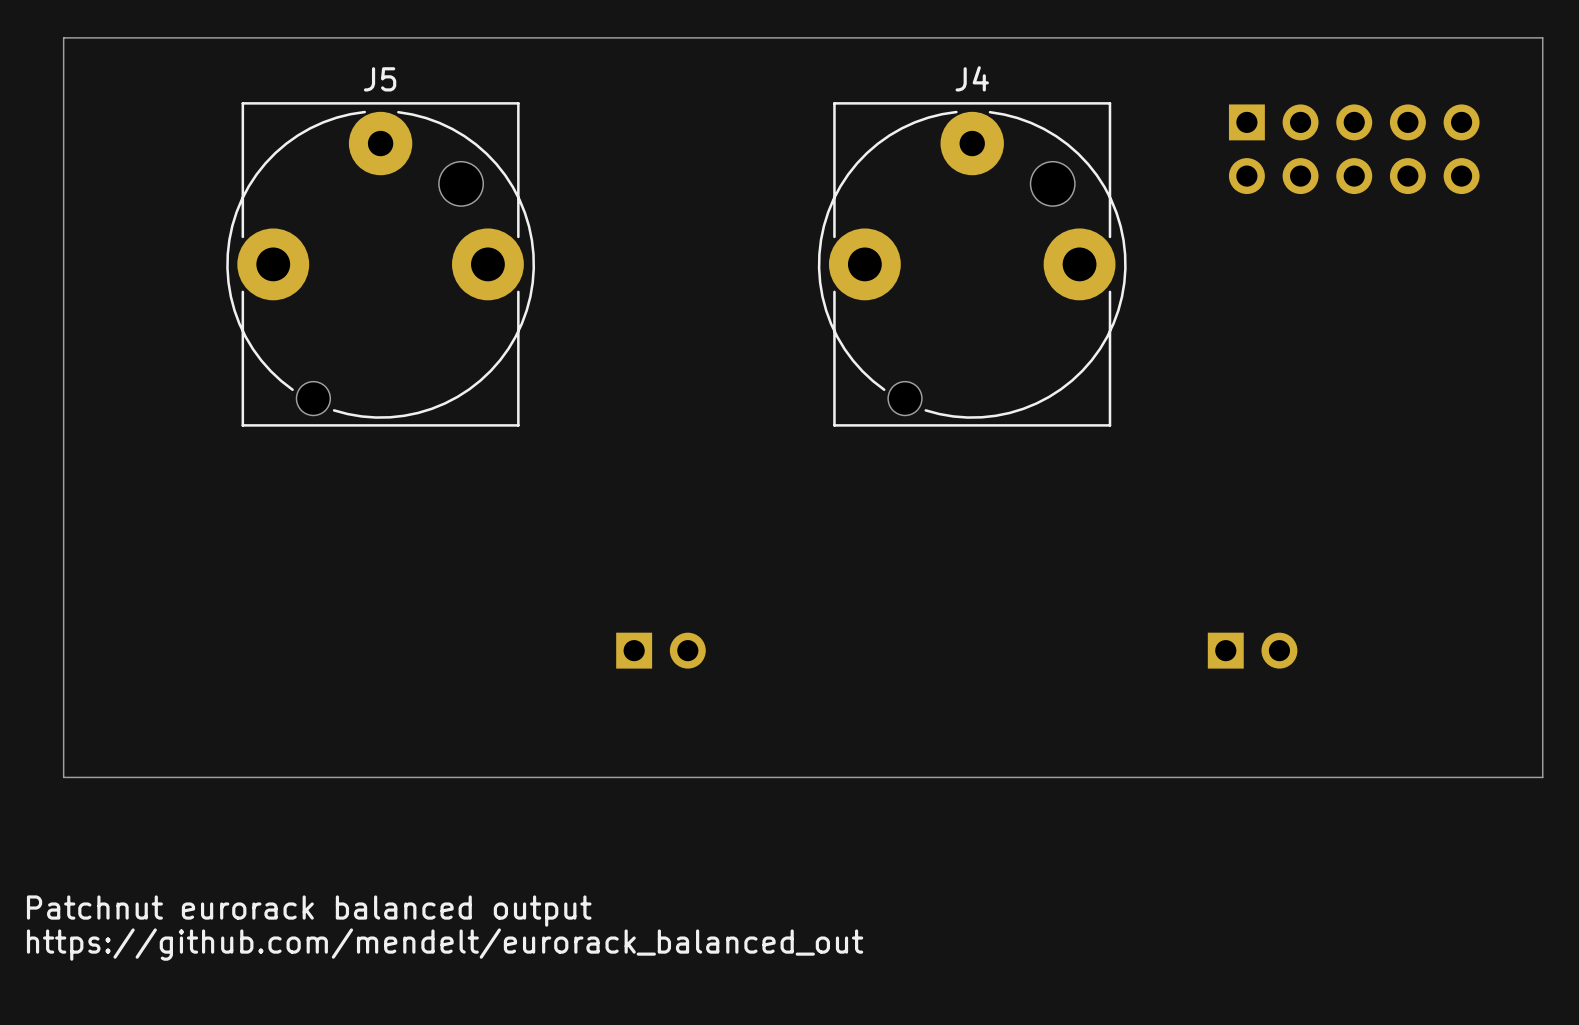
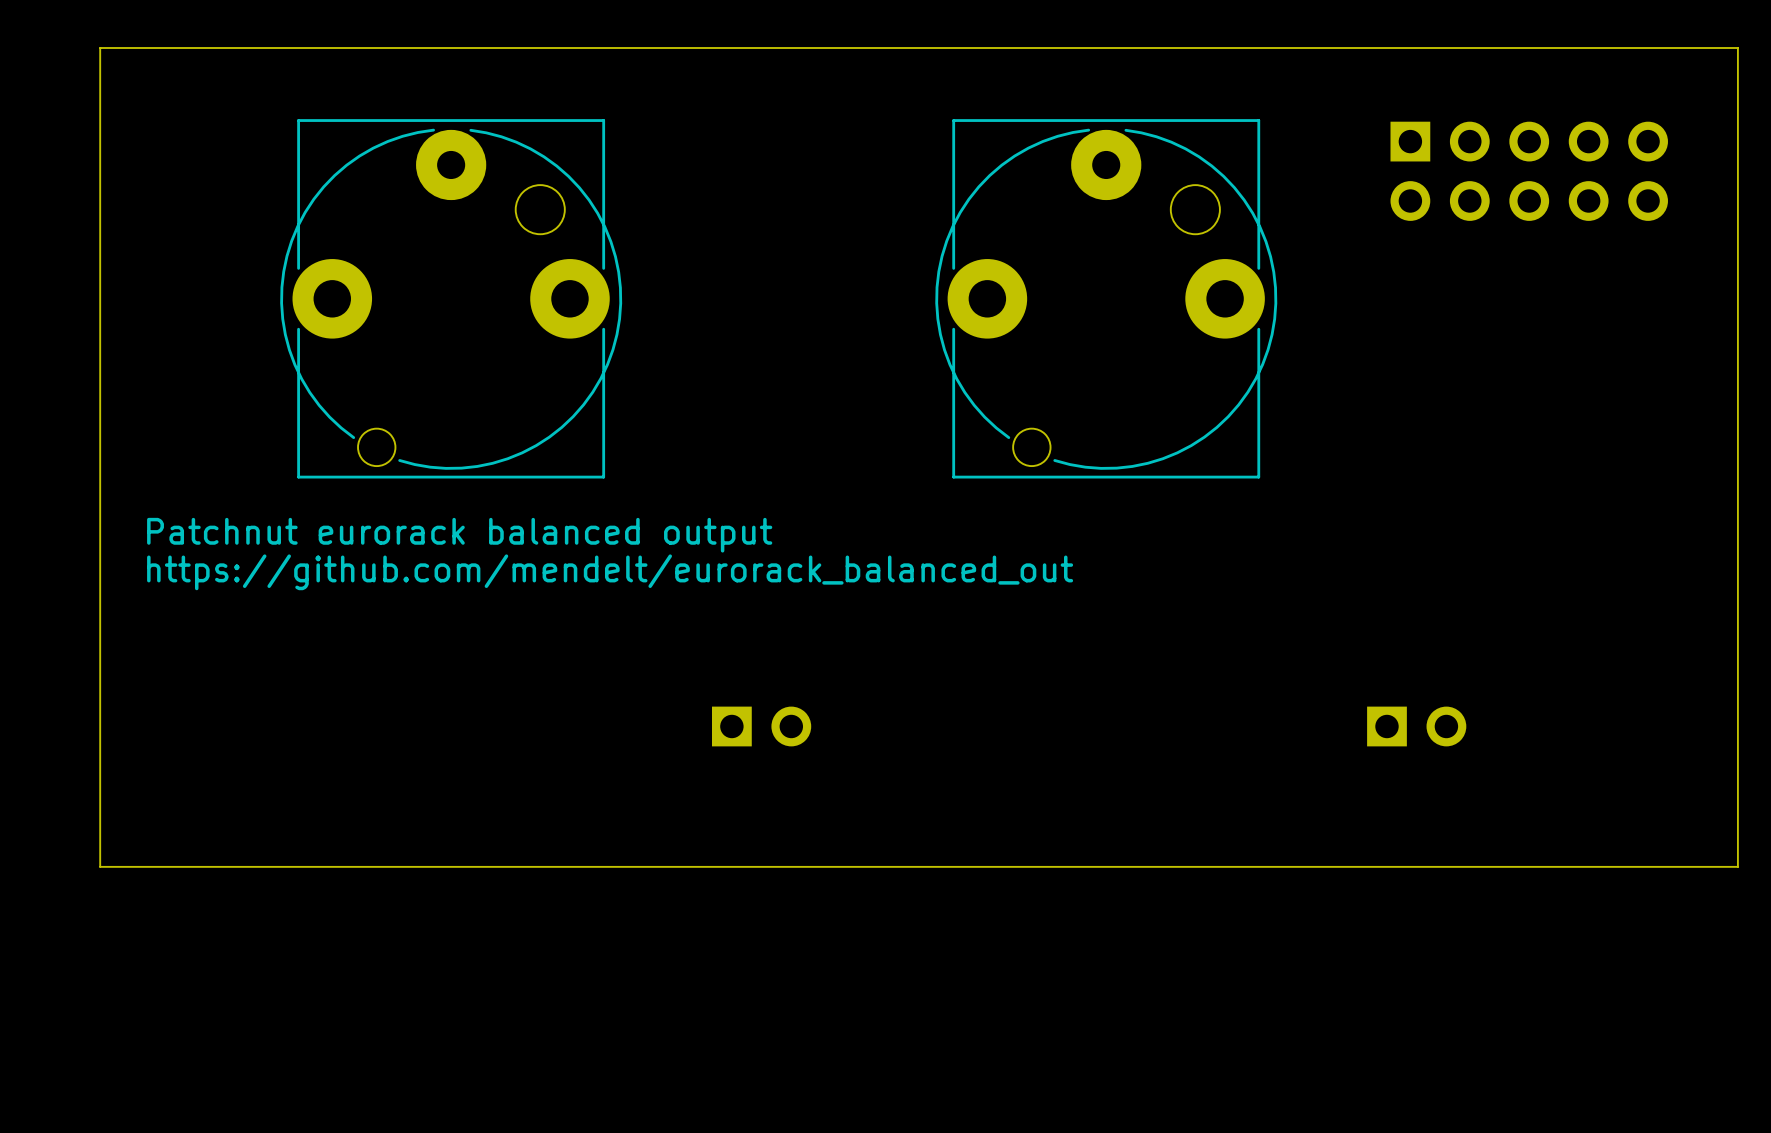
J4 name: J4 (972, 78) -> none
J5 name: J5 (380, 79) -> none
text position: Patchnut eurorack balanced output (309, 911) -> Patchnut eurorack balanced output (459, 535)
text position: https://github.com/mendelt/eurorack_balanced_out (445, 944) -> https://github.com/mendelt/eurorack_balanced_out (610, 572)

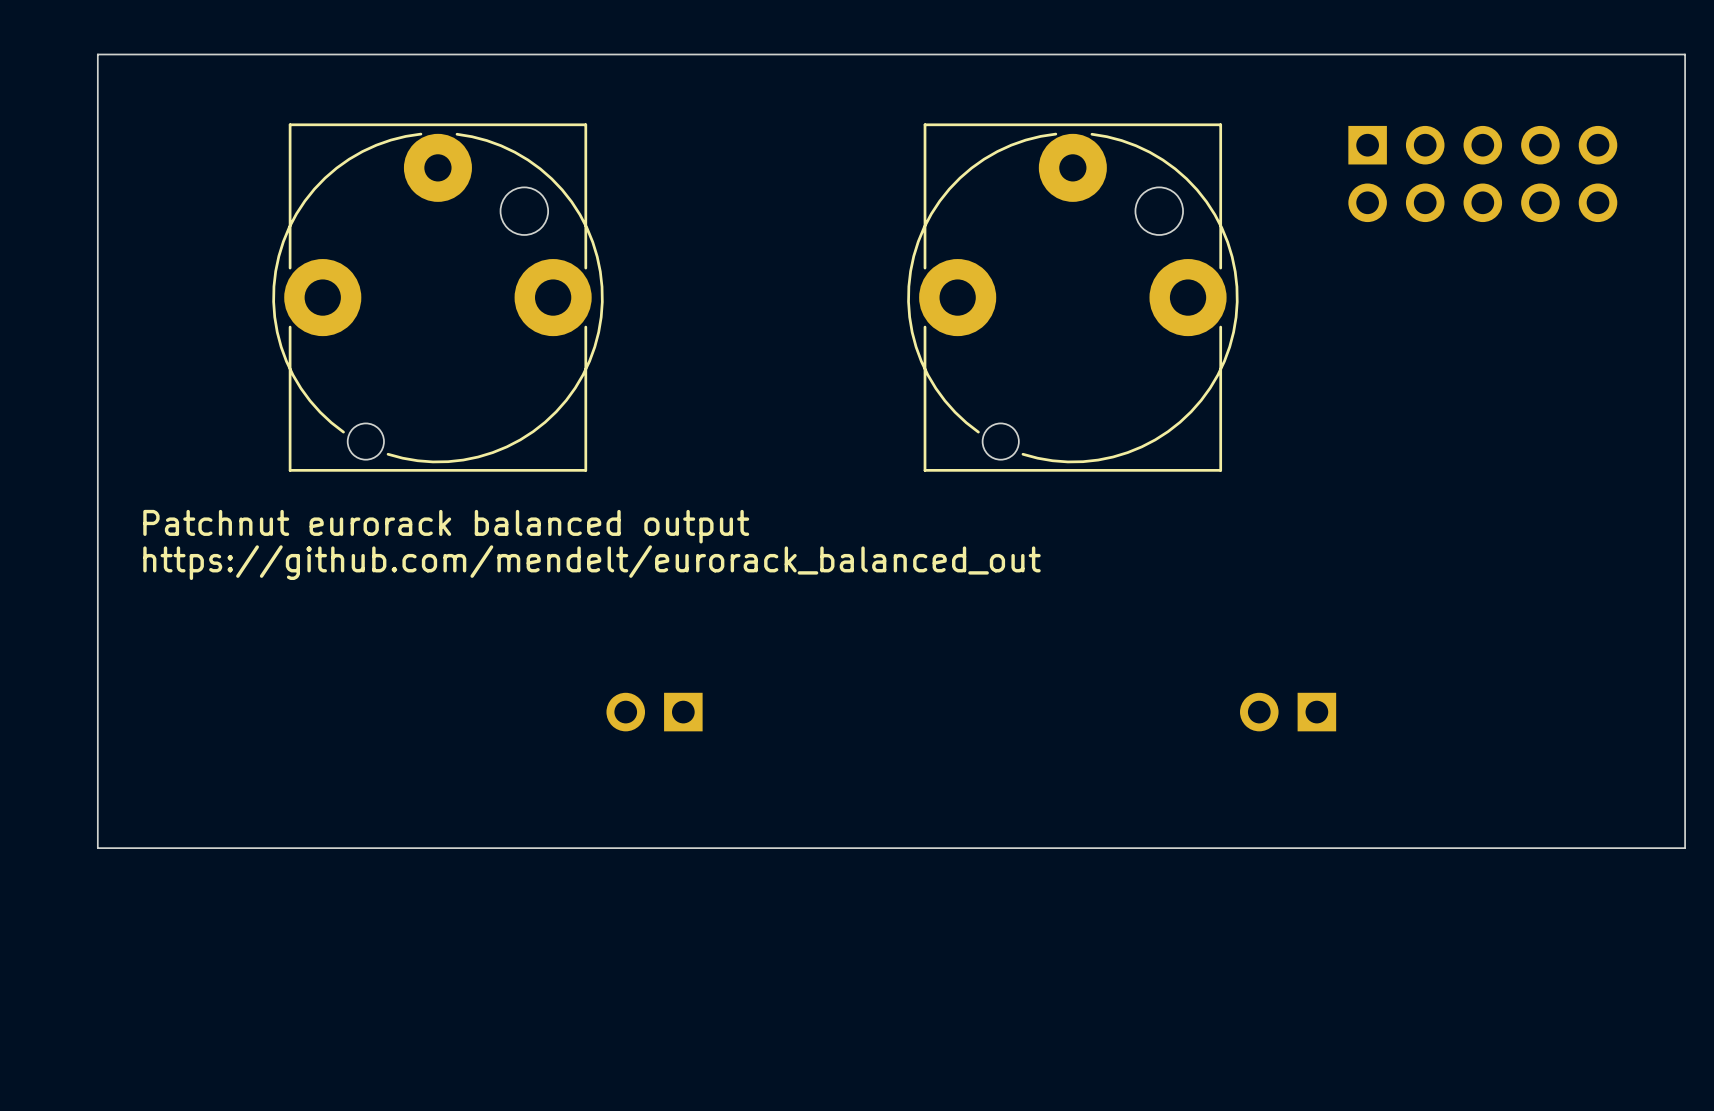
part rotation: 0° (761, 726) -> 180° (654, 712)
part position: (761, 726) -> (654, 712)
part rotation: 0° (1416, 726) -> 180° (1288, 712)
part position: (1416, 726) -> (1288, 712)

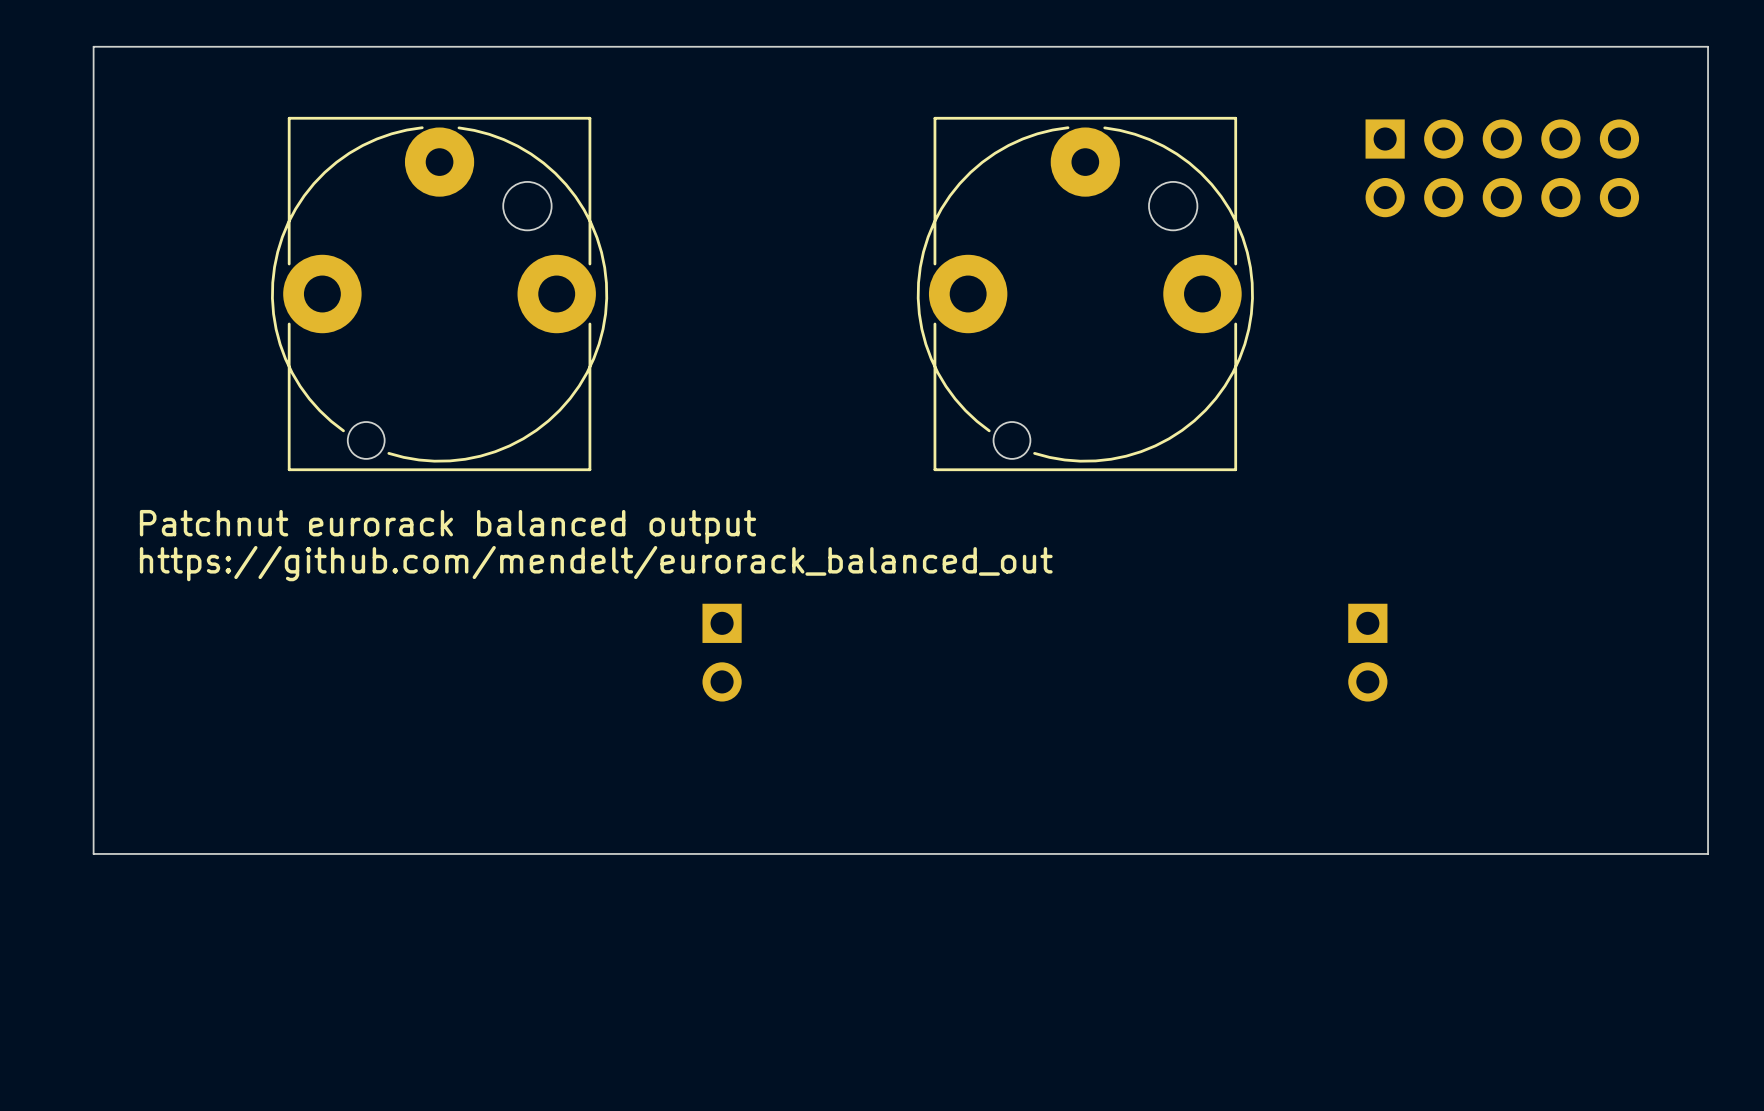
part rotation: 0° (654, 712) -> 90° counterclockwise (722, 652)
part position: (654, 712) -> (722, 652)
part rotation: 0° (1288, 712) -> 90° counterclockwise (1367, 652)
part position: (1288, 712) -> (1367, 652)

